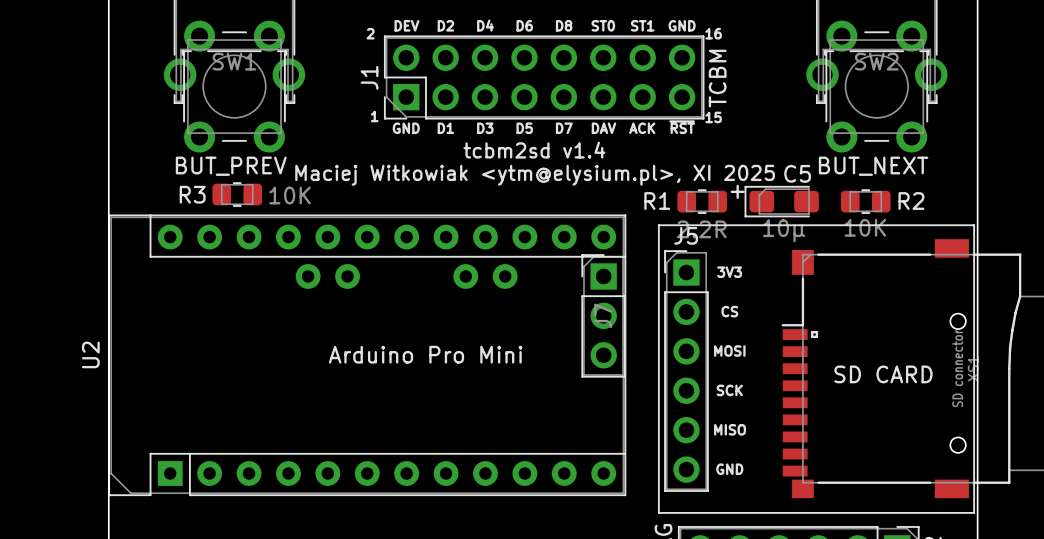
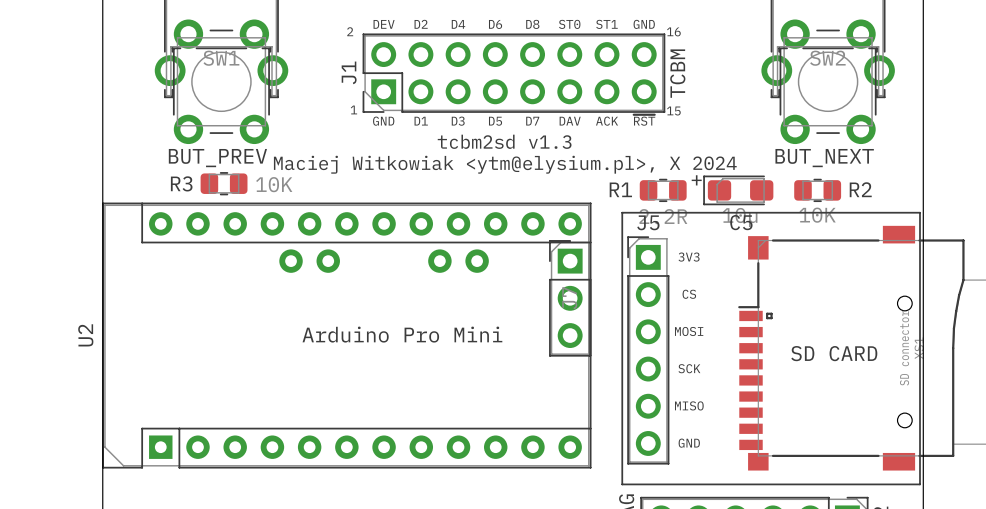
text: tcbm2sd v1.4 (534, 150) -> tcbm2sd v1.3 (504, 141)
C5 name position: C5 (797, 173) -> C5 (741, 222)
text: Maciej Witkowiak <ytm@elysium.pl>, XI 2025 (535, 175) -> Maciej Witkowiak <ytm@elysium.pl>, X 2024 (505, 164)

